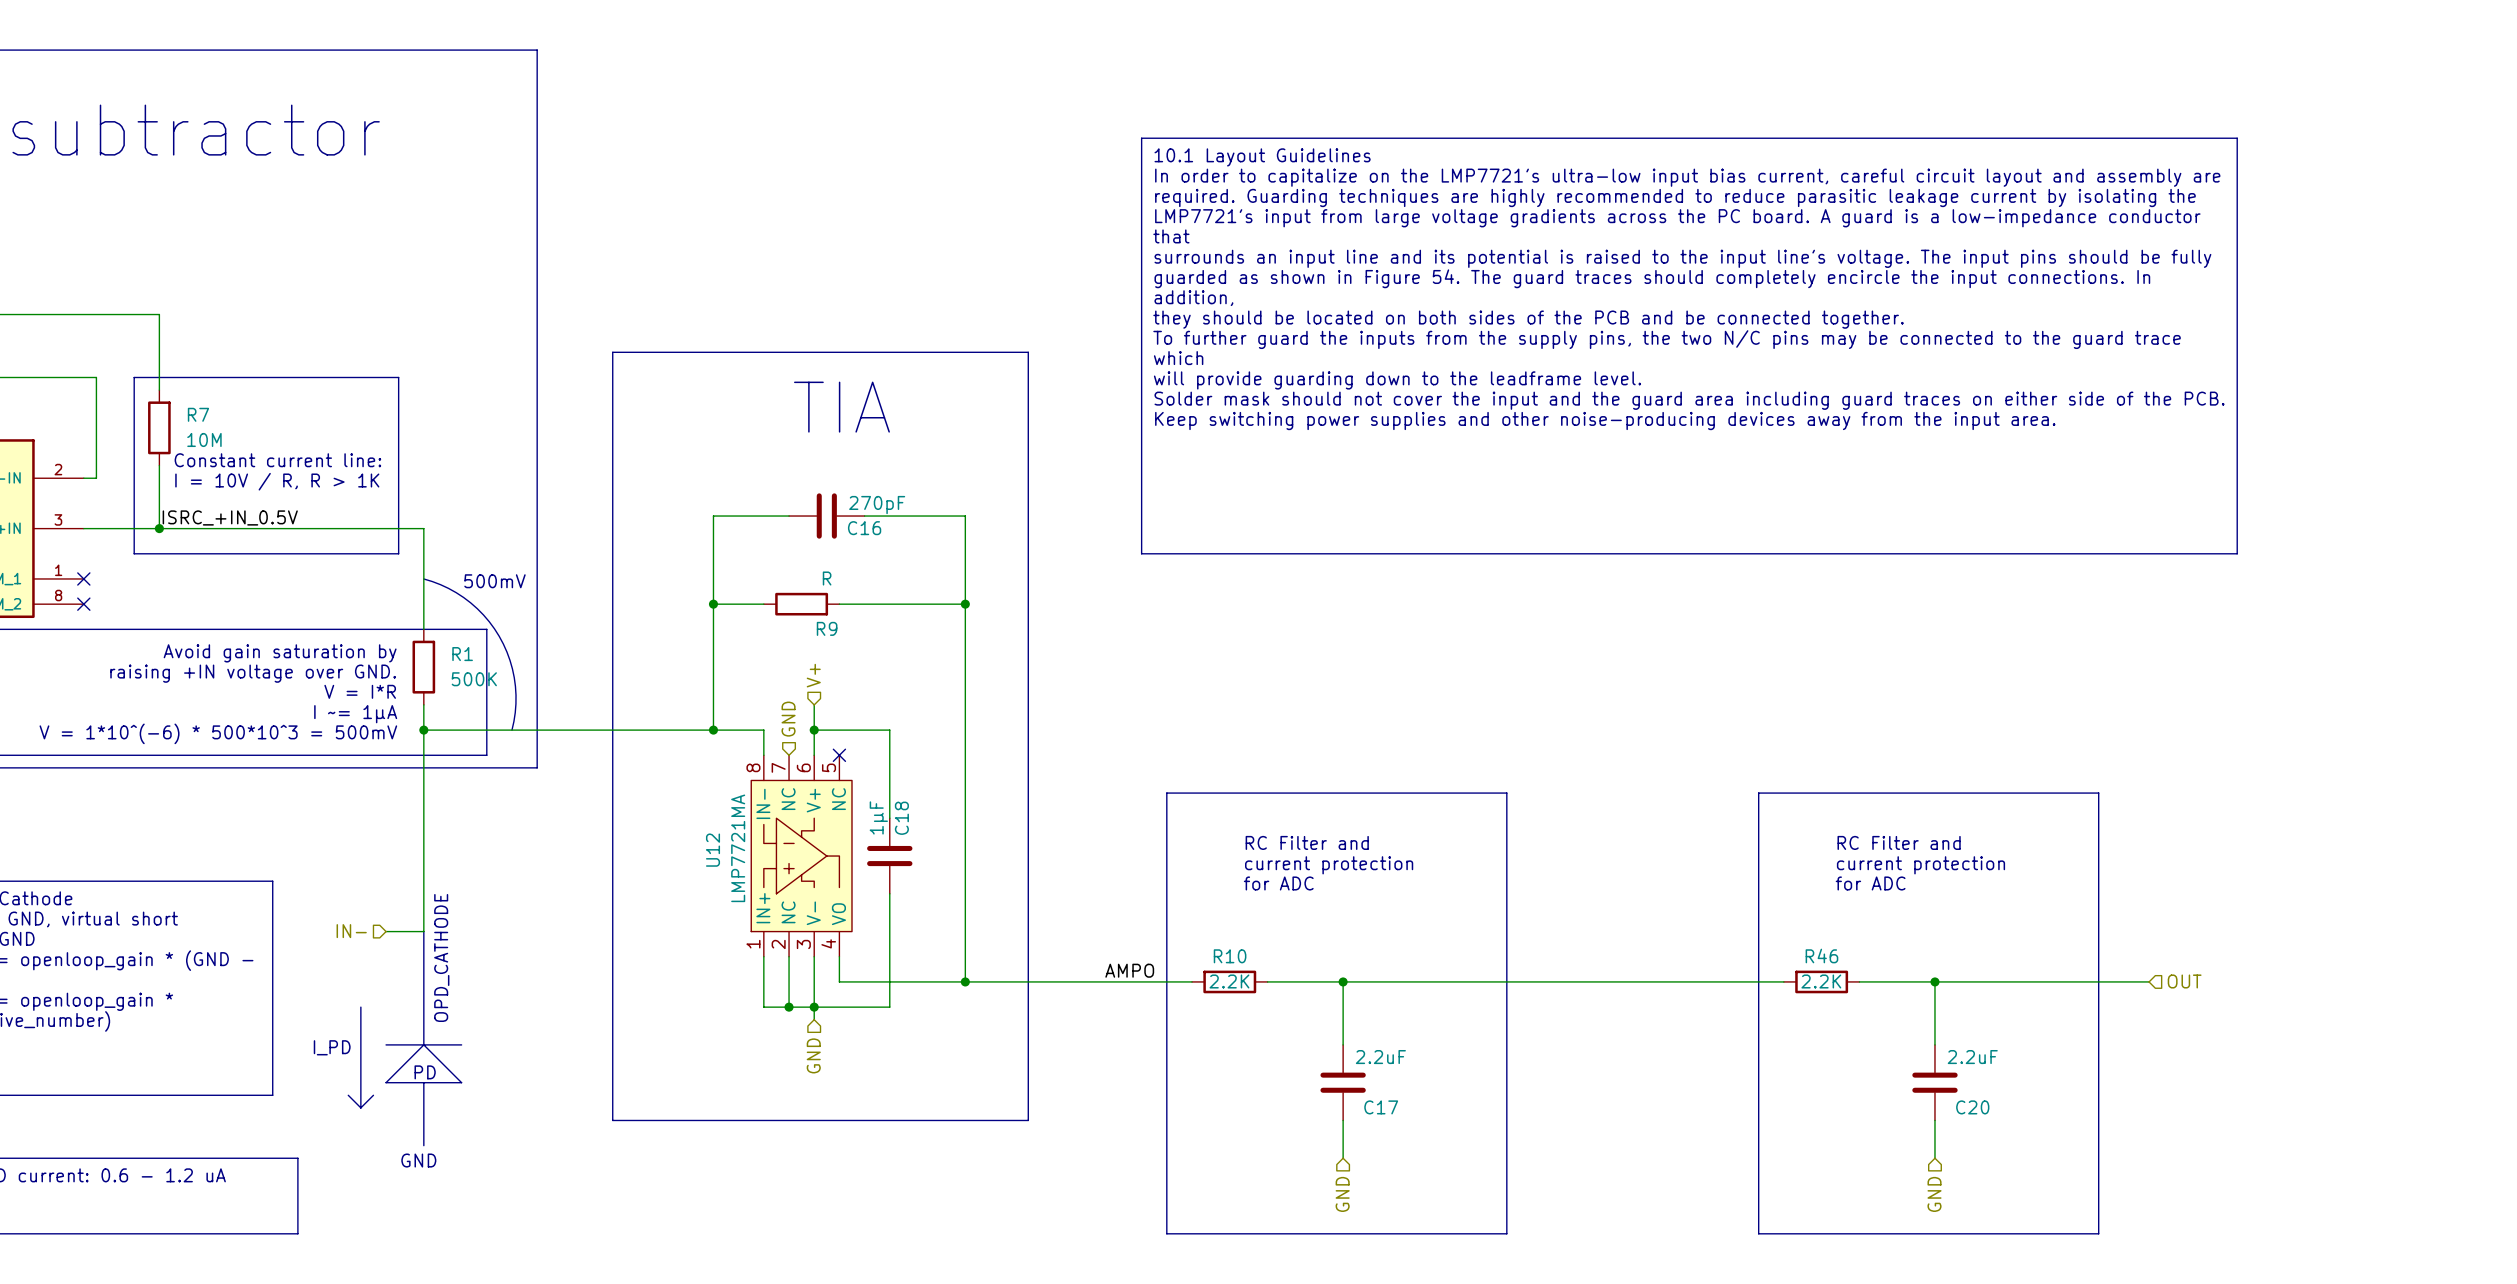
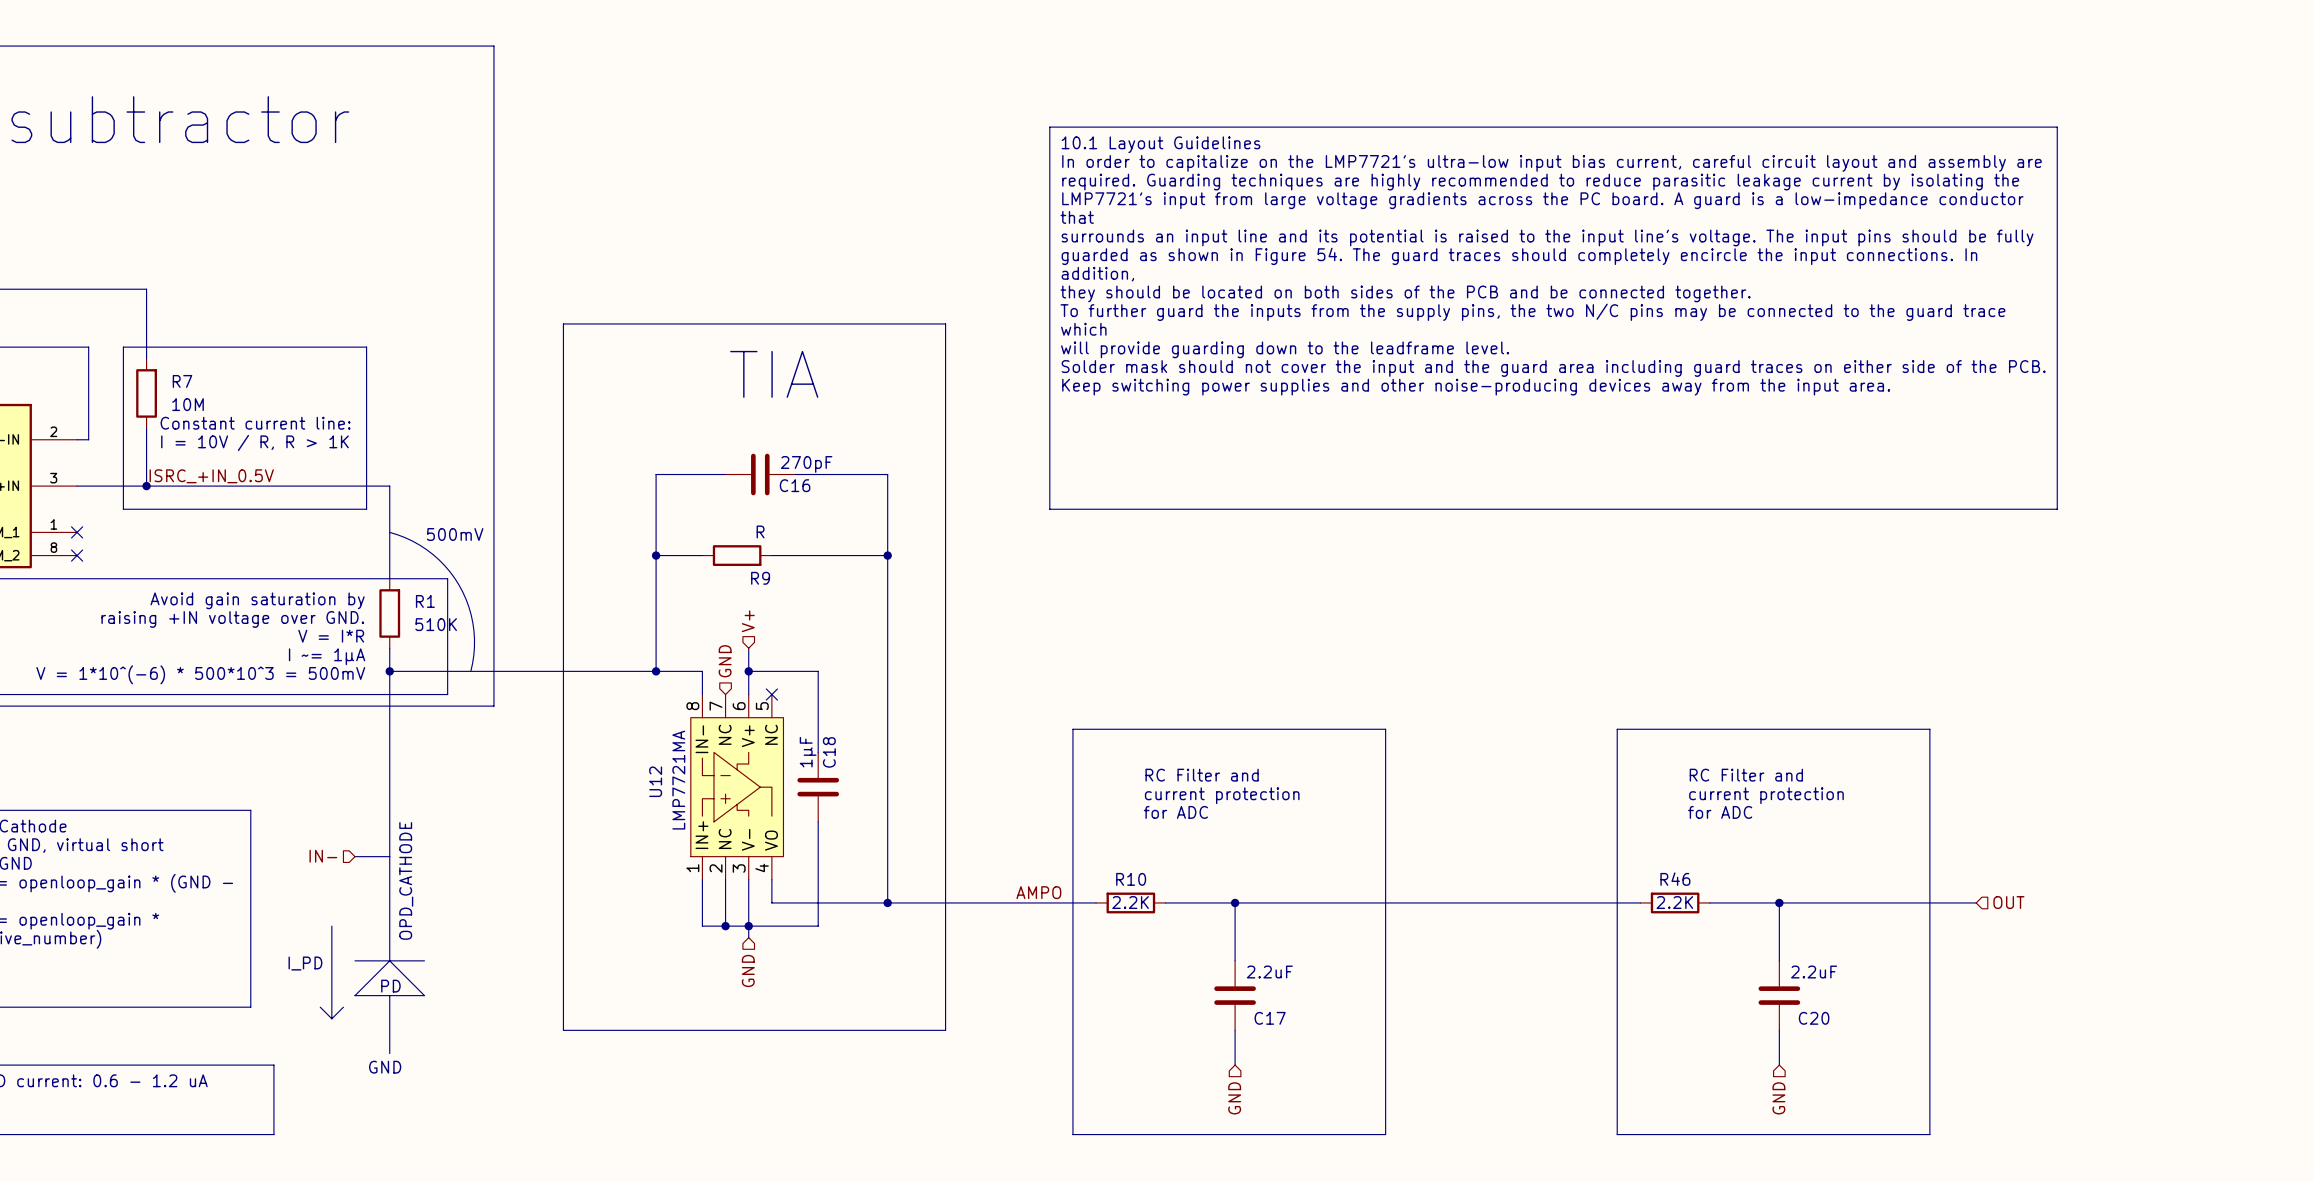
R1 value: 500K (474, 679) -> 510K (436, 624)

